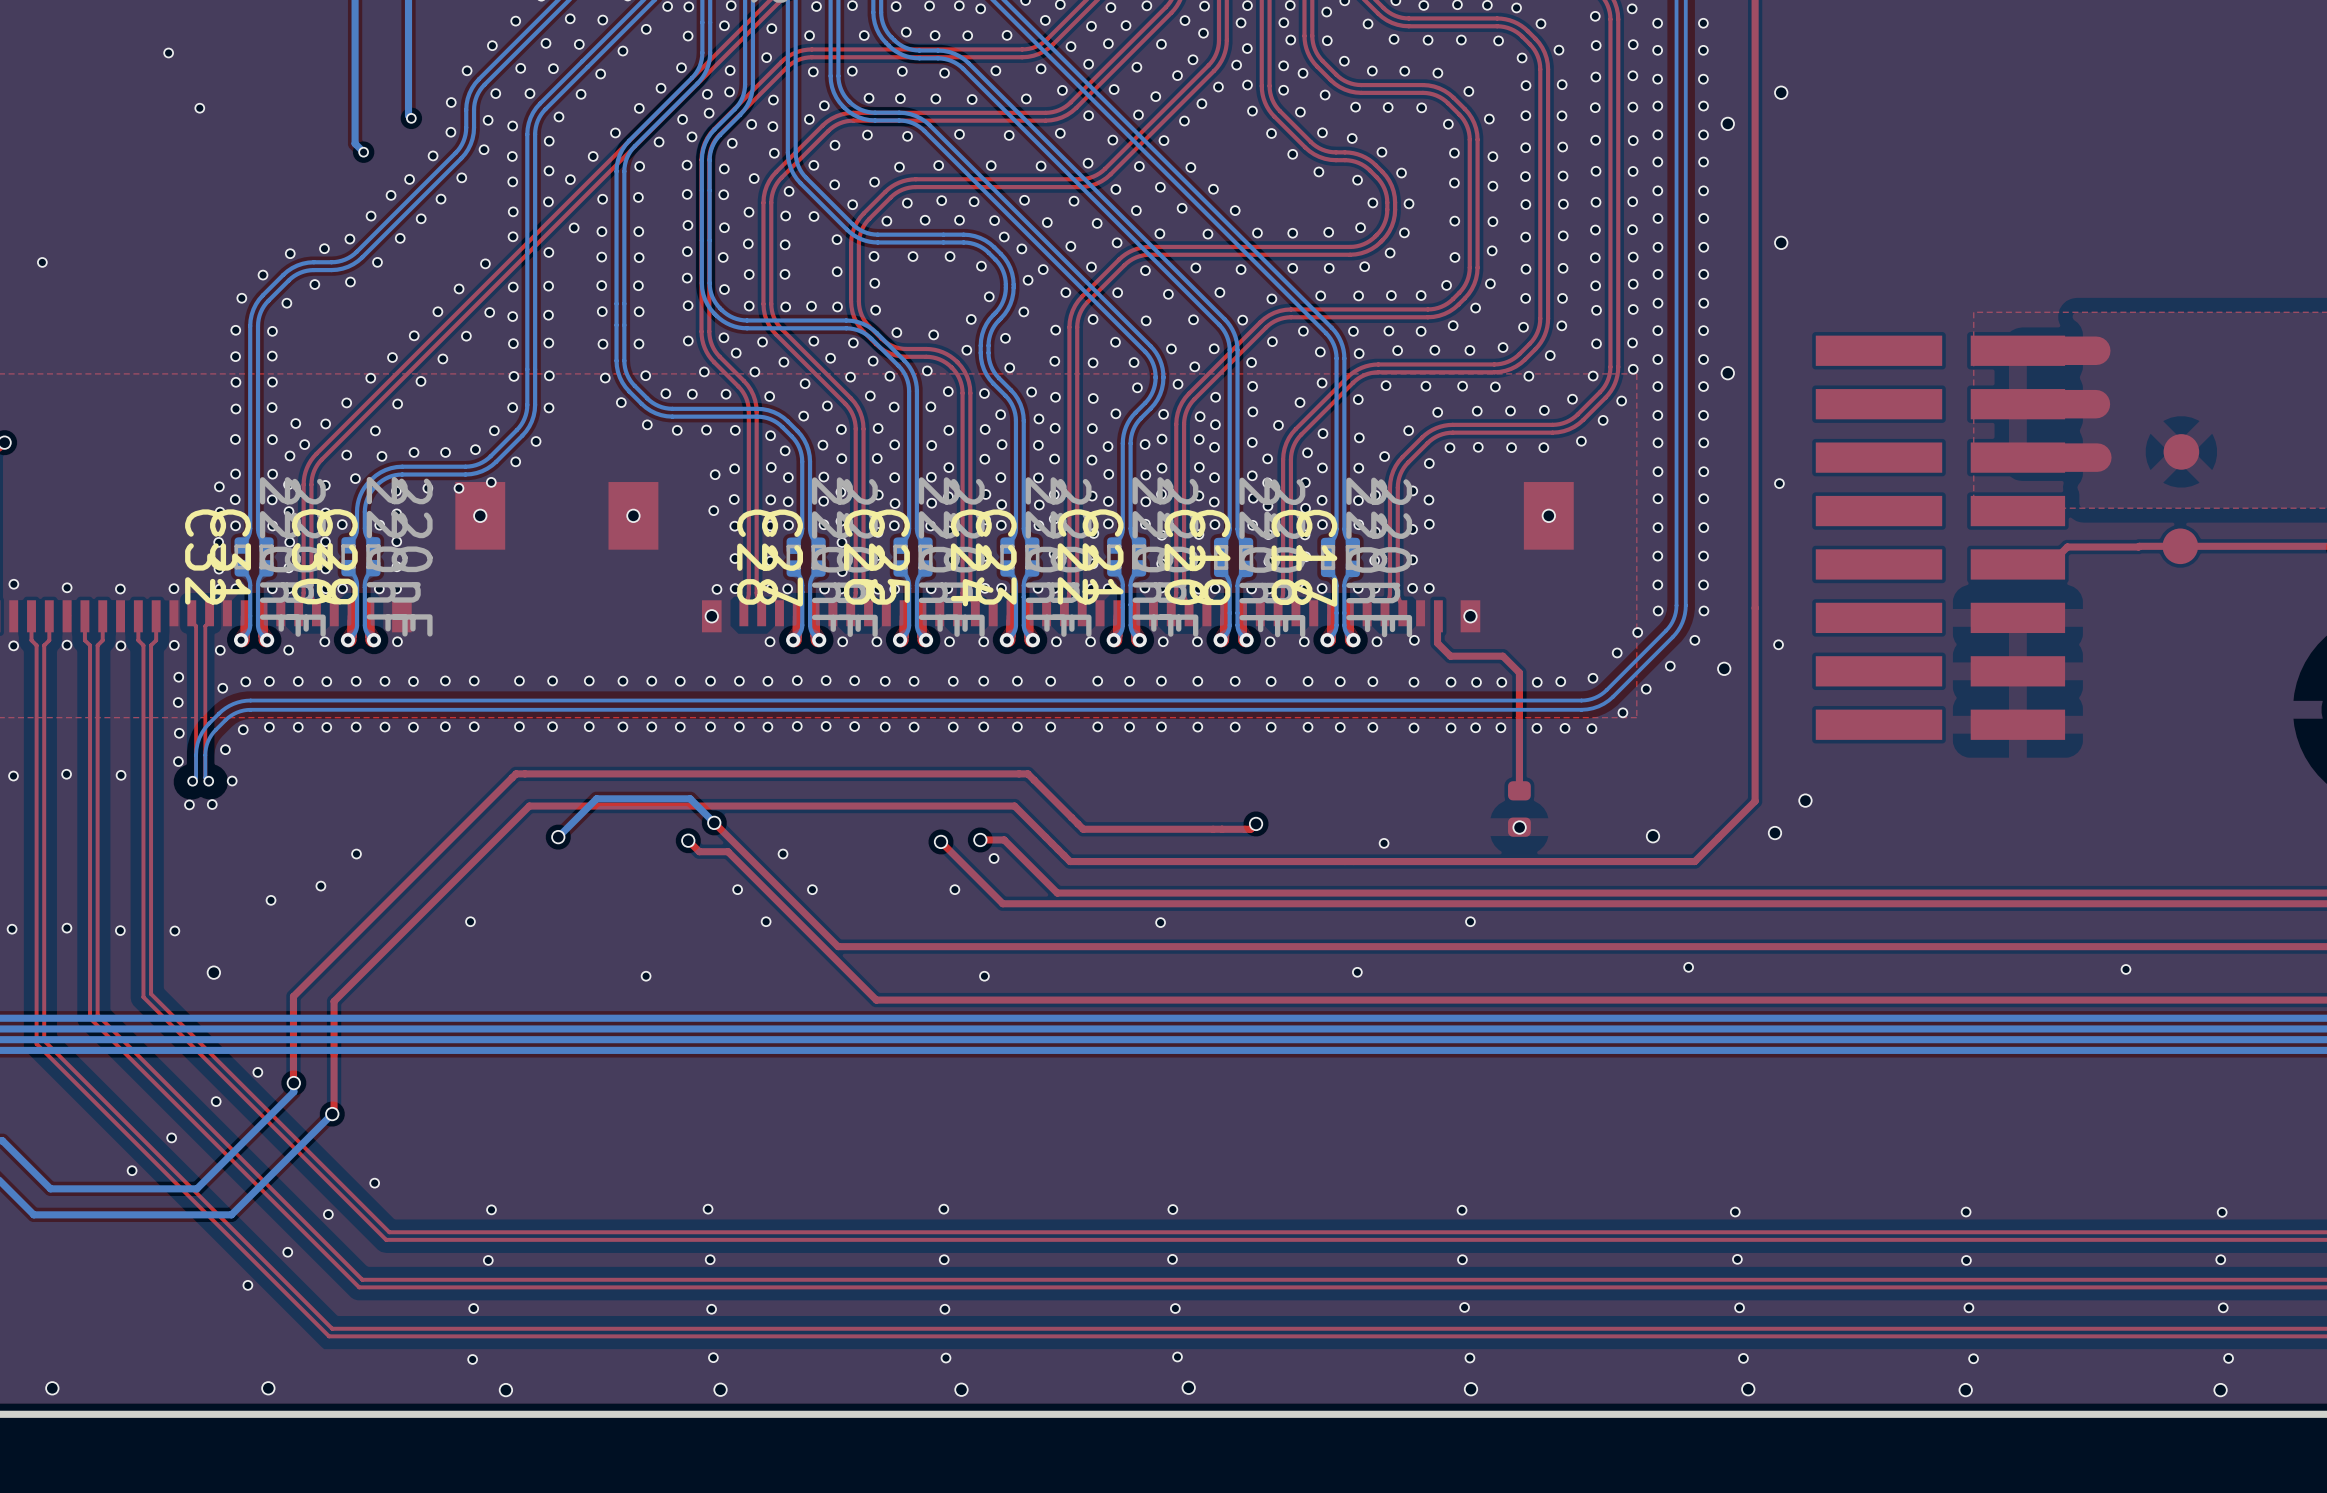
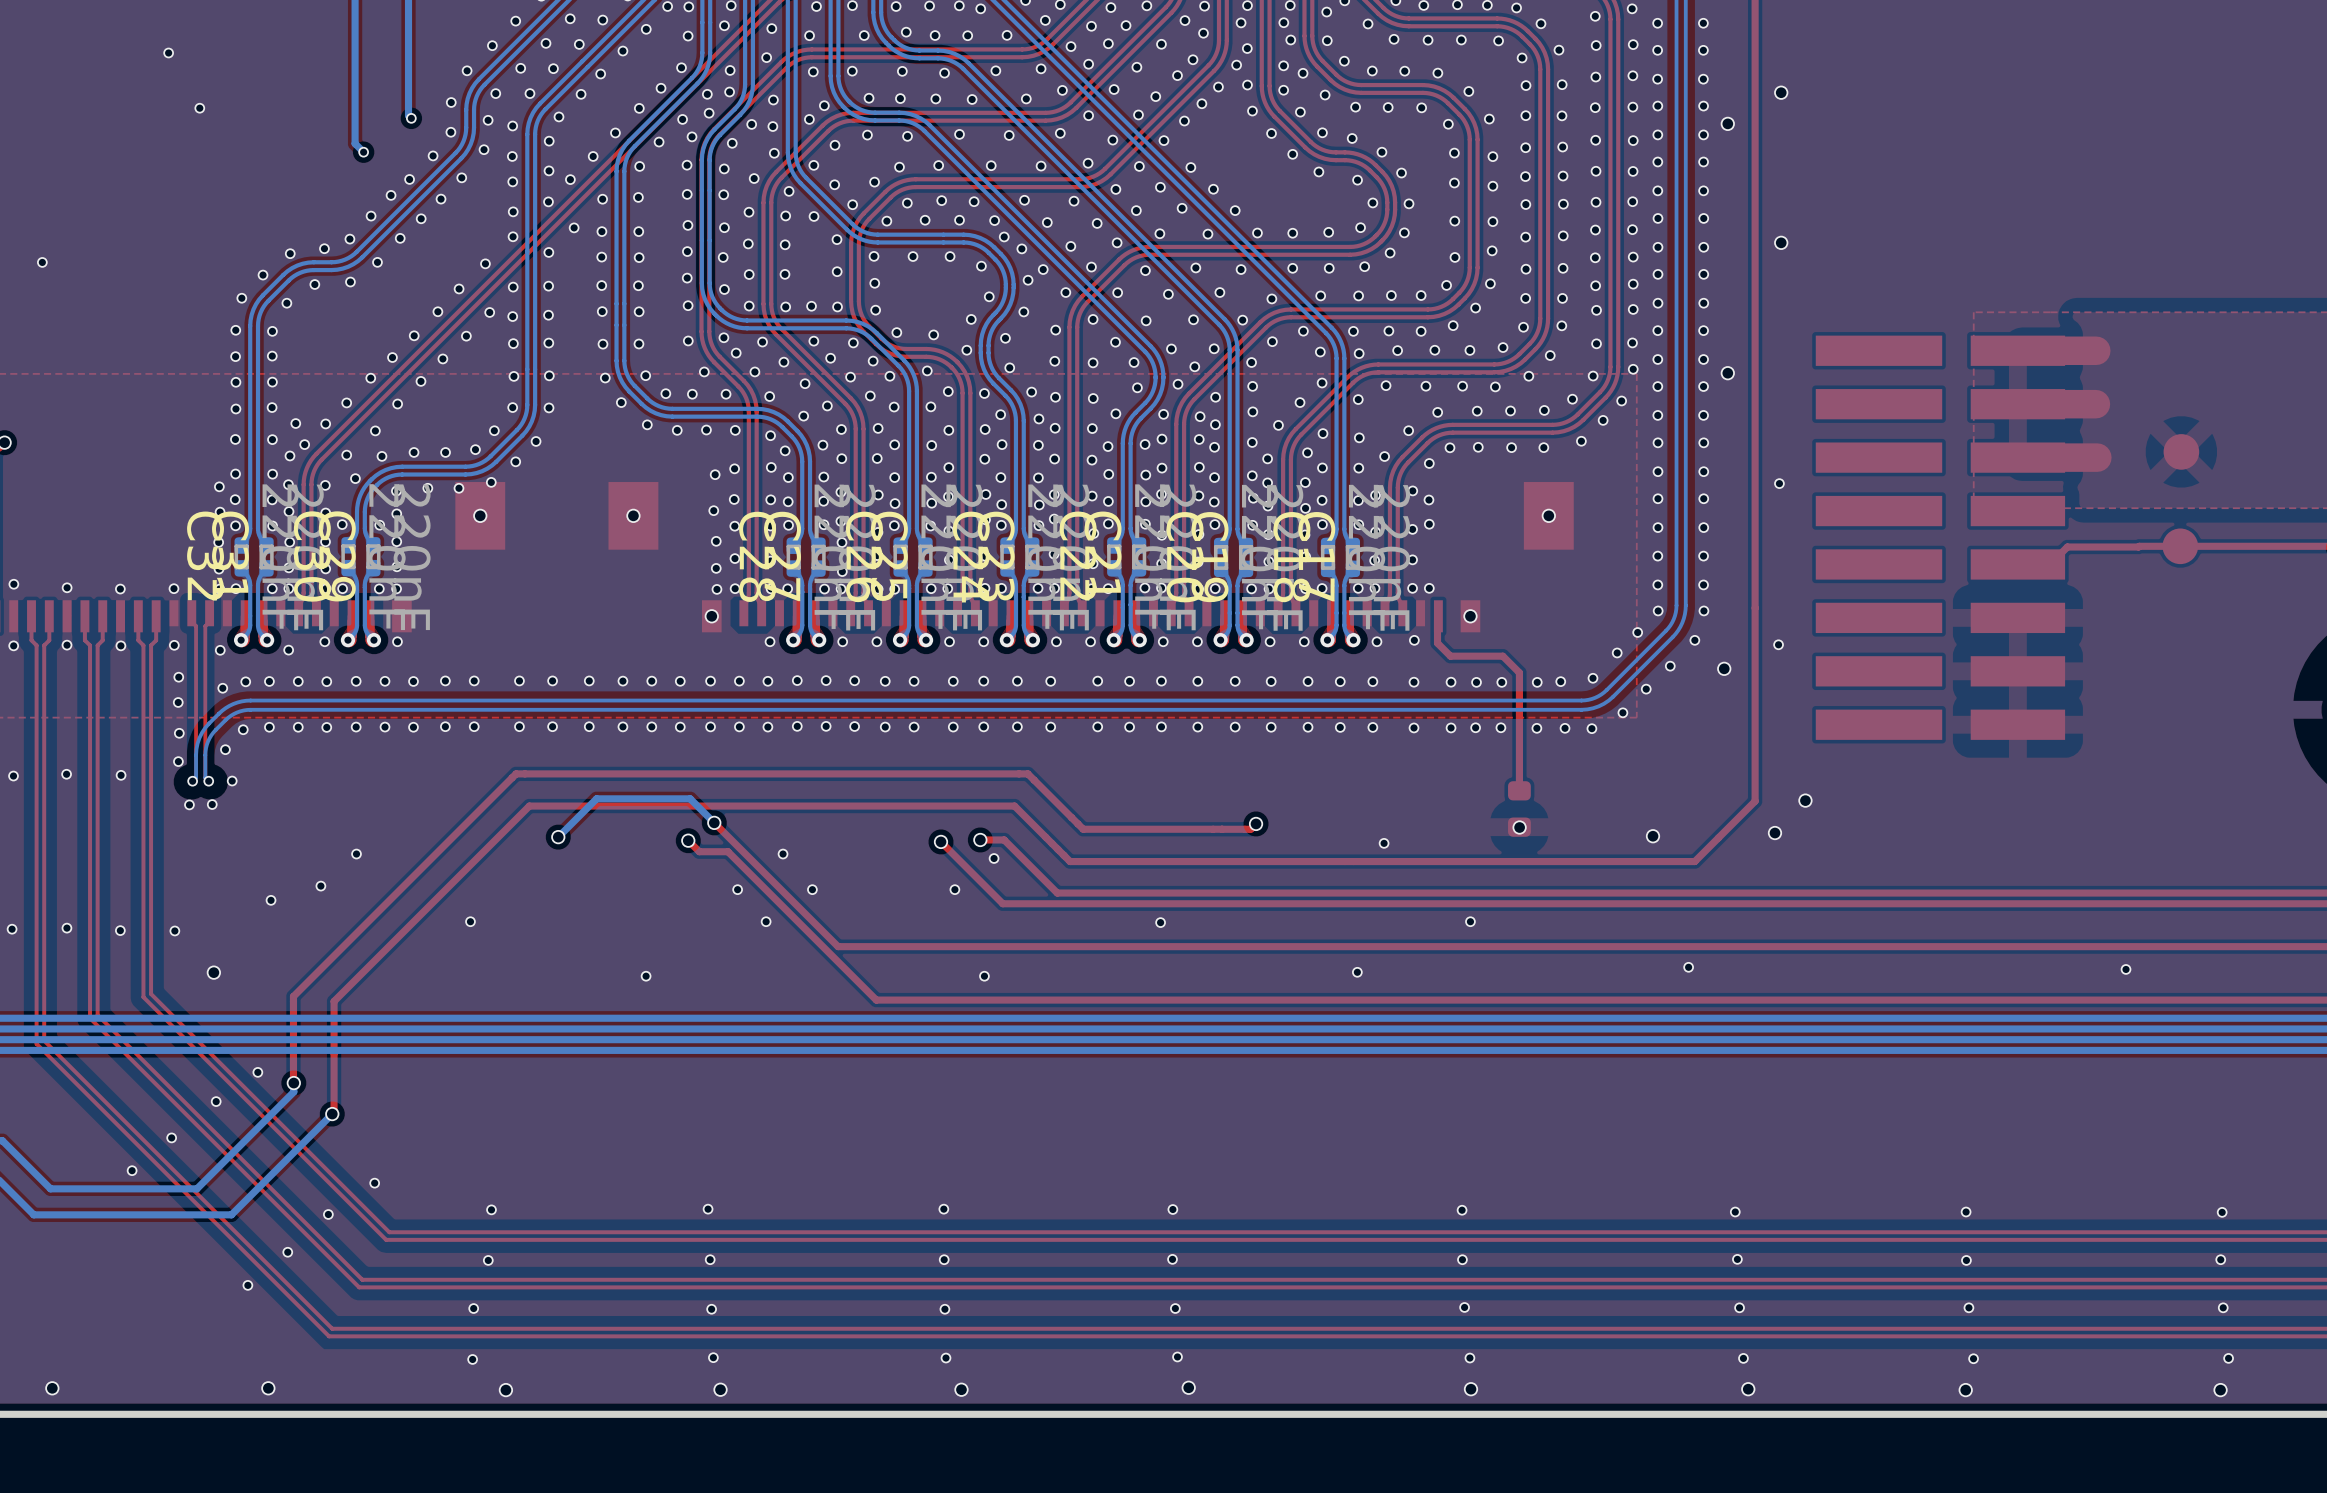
via: none -> (716, 541)
via: none -> (716, 568)

